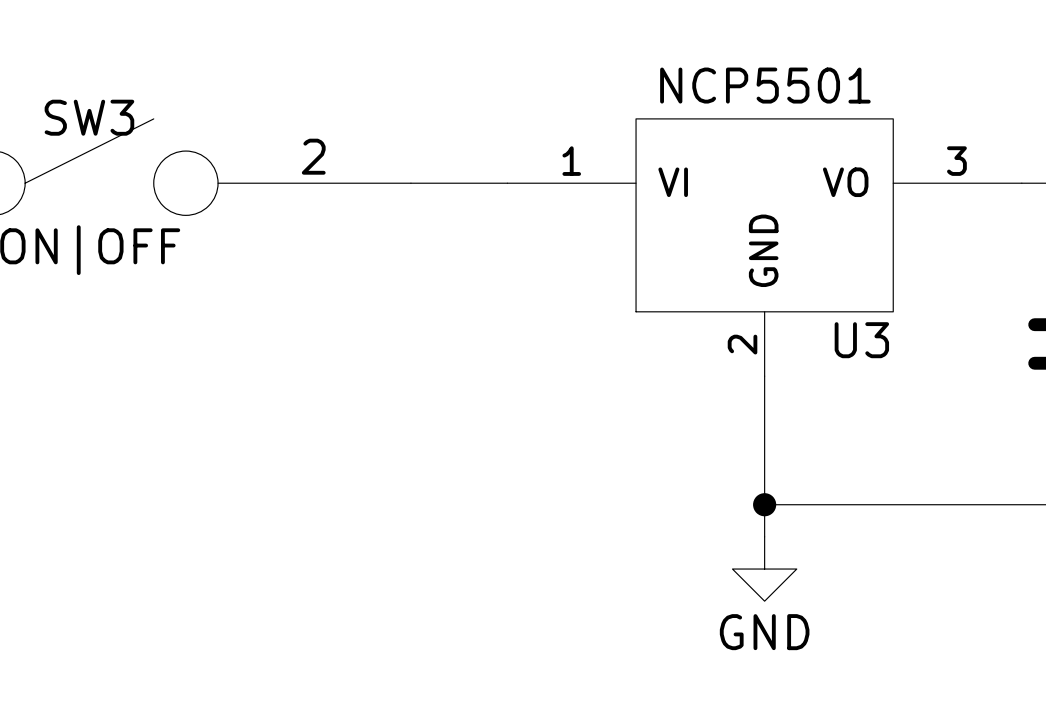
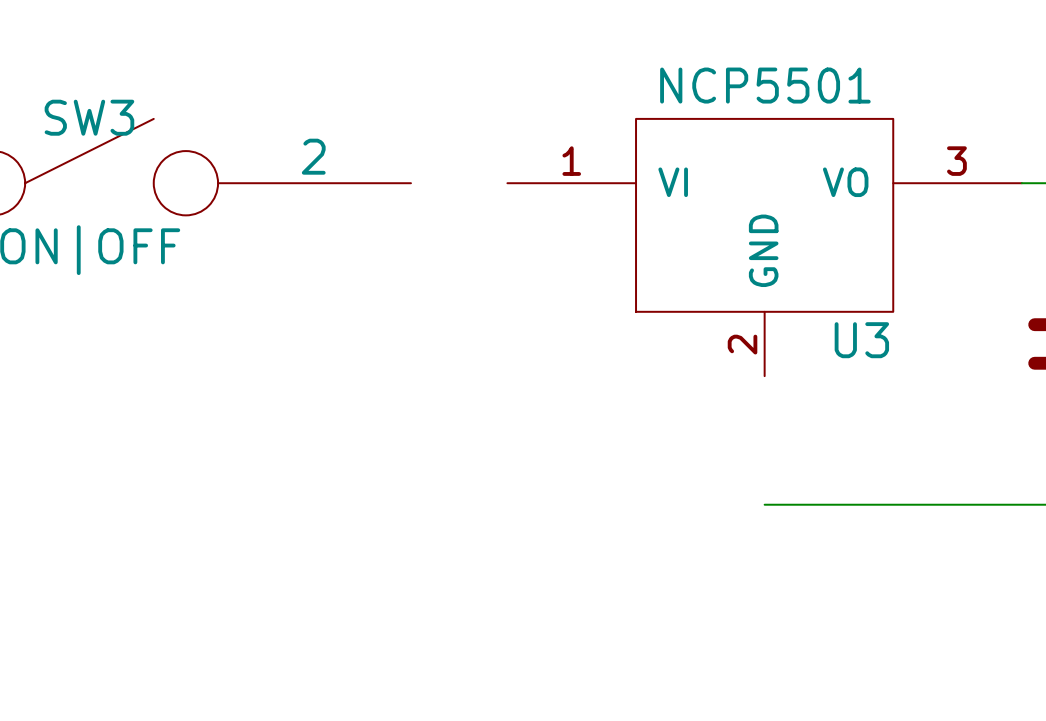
wire: (410, 183) (507, 183) -> none
wire: (764, 376) (764, 536) -> none
junction: (764, 504) -> none
power symbol: GND (764, 569) -> none

